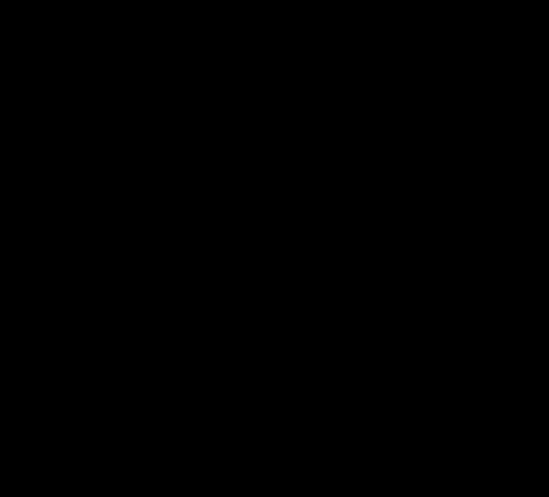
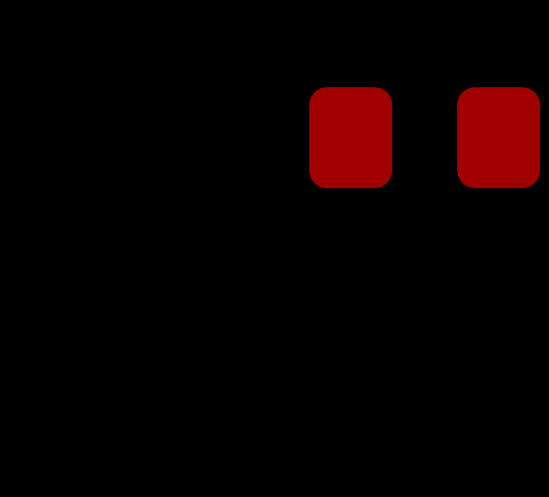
part: none -> (424, 137)

